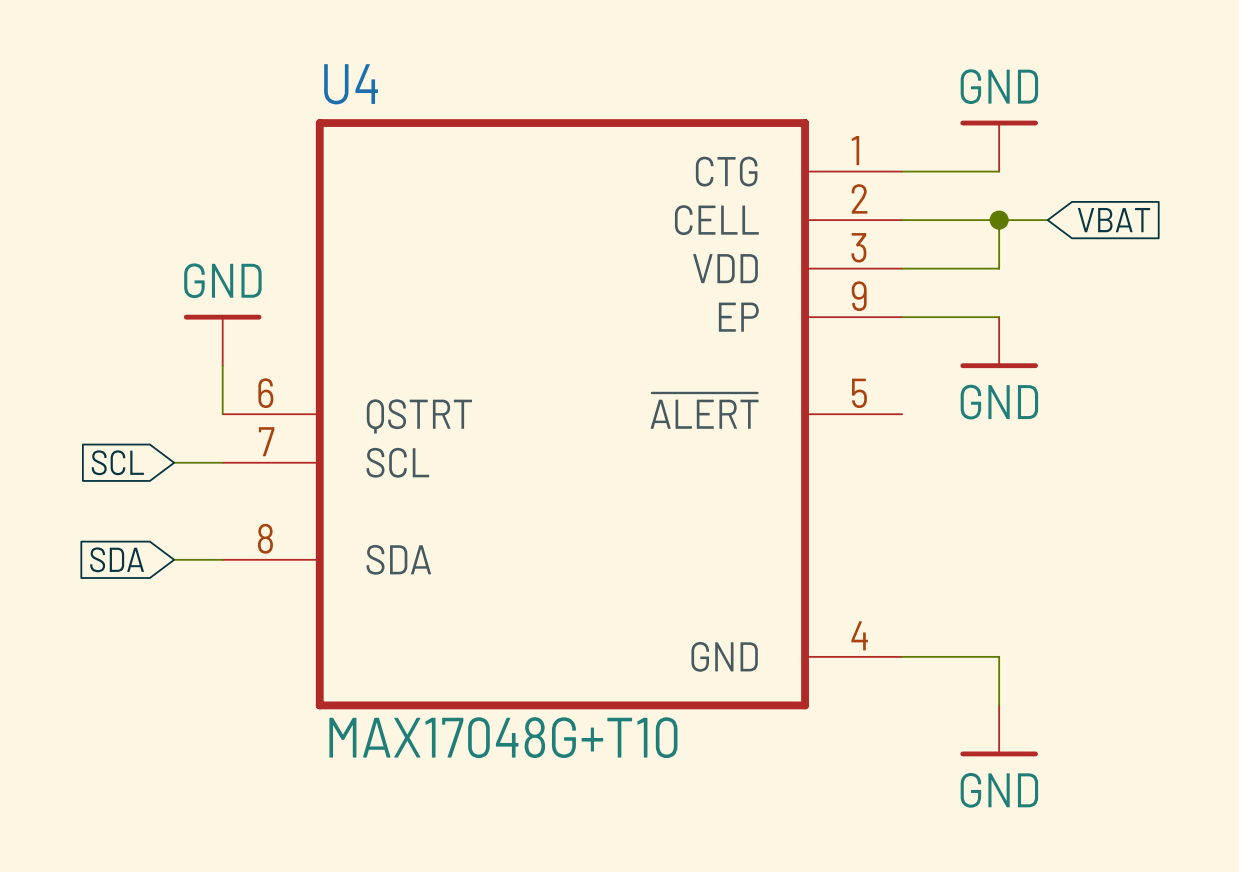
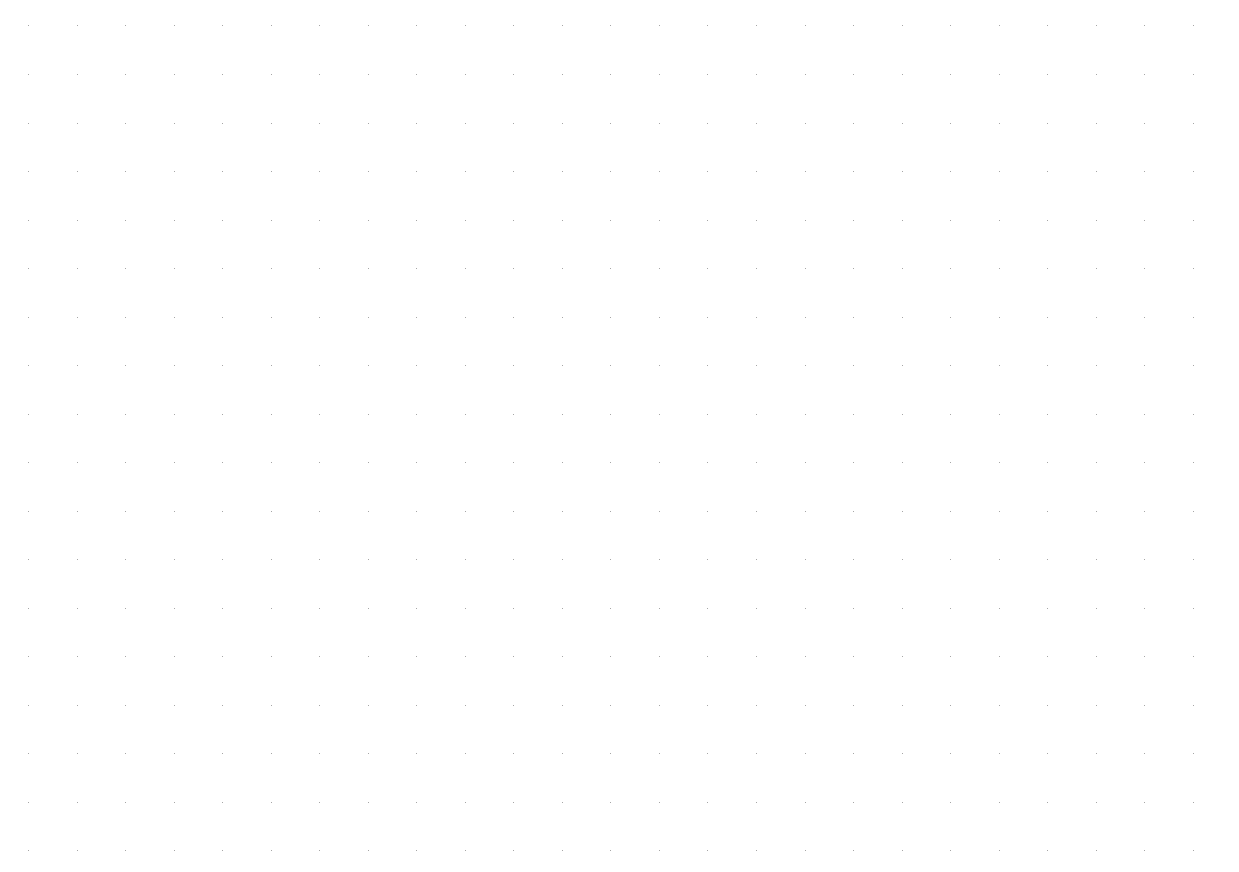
power symbol: GND (999, 146) -> none
wire: (902, 171) (999, 171) -> none
wire: (902, 220) (1047, 220) -> none
wire: (999, 220) (999, 268) (902, 268) -> none
junction: (999, 220) -> none
global label: VBAT (1113, 220) -> none
wire: (902, 317) (999, 317) -> none
power symbol: GND (222, 340) -> none
power symbol: GND (999, 342) -> none
wire: (222, 365) (222, 414) -> none
U4: MAX17048G+T10 (562, 414) -> none
global label: SCL (117, 462) -> none
wire: (174, 462) (222, 462) -> none
global label: SDA (117, 559) -> none
wire: (174, 559) (222, 559) -> none
wire: (902, 656) (999, 656) (999, 705) -> none
power symbol: GND (999, 730) -> none

